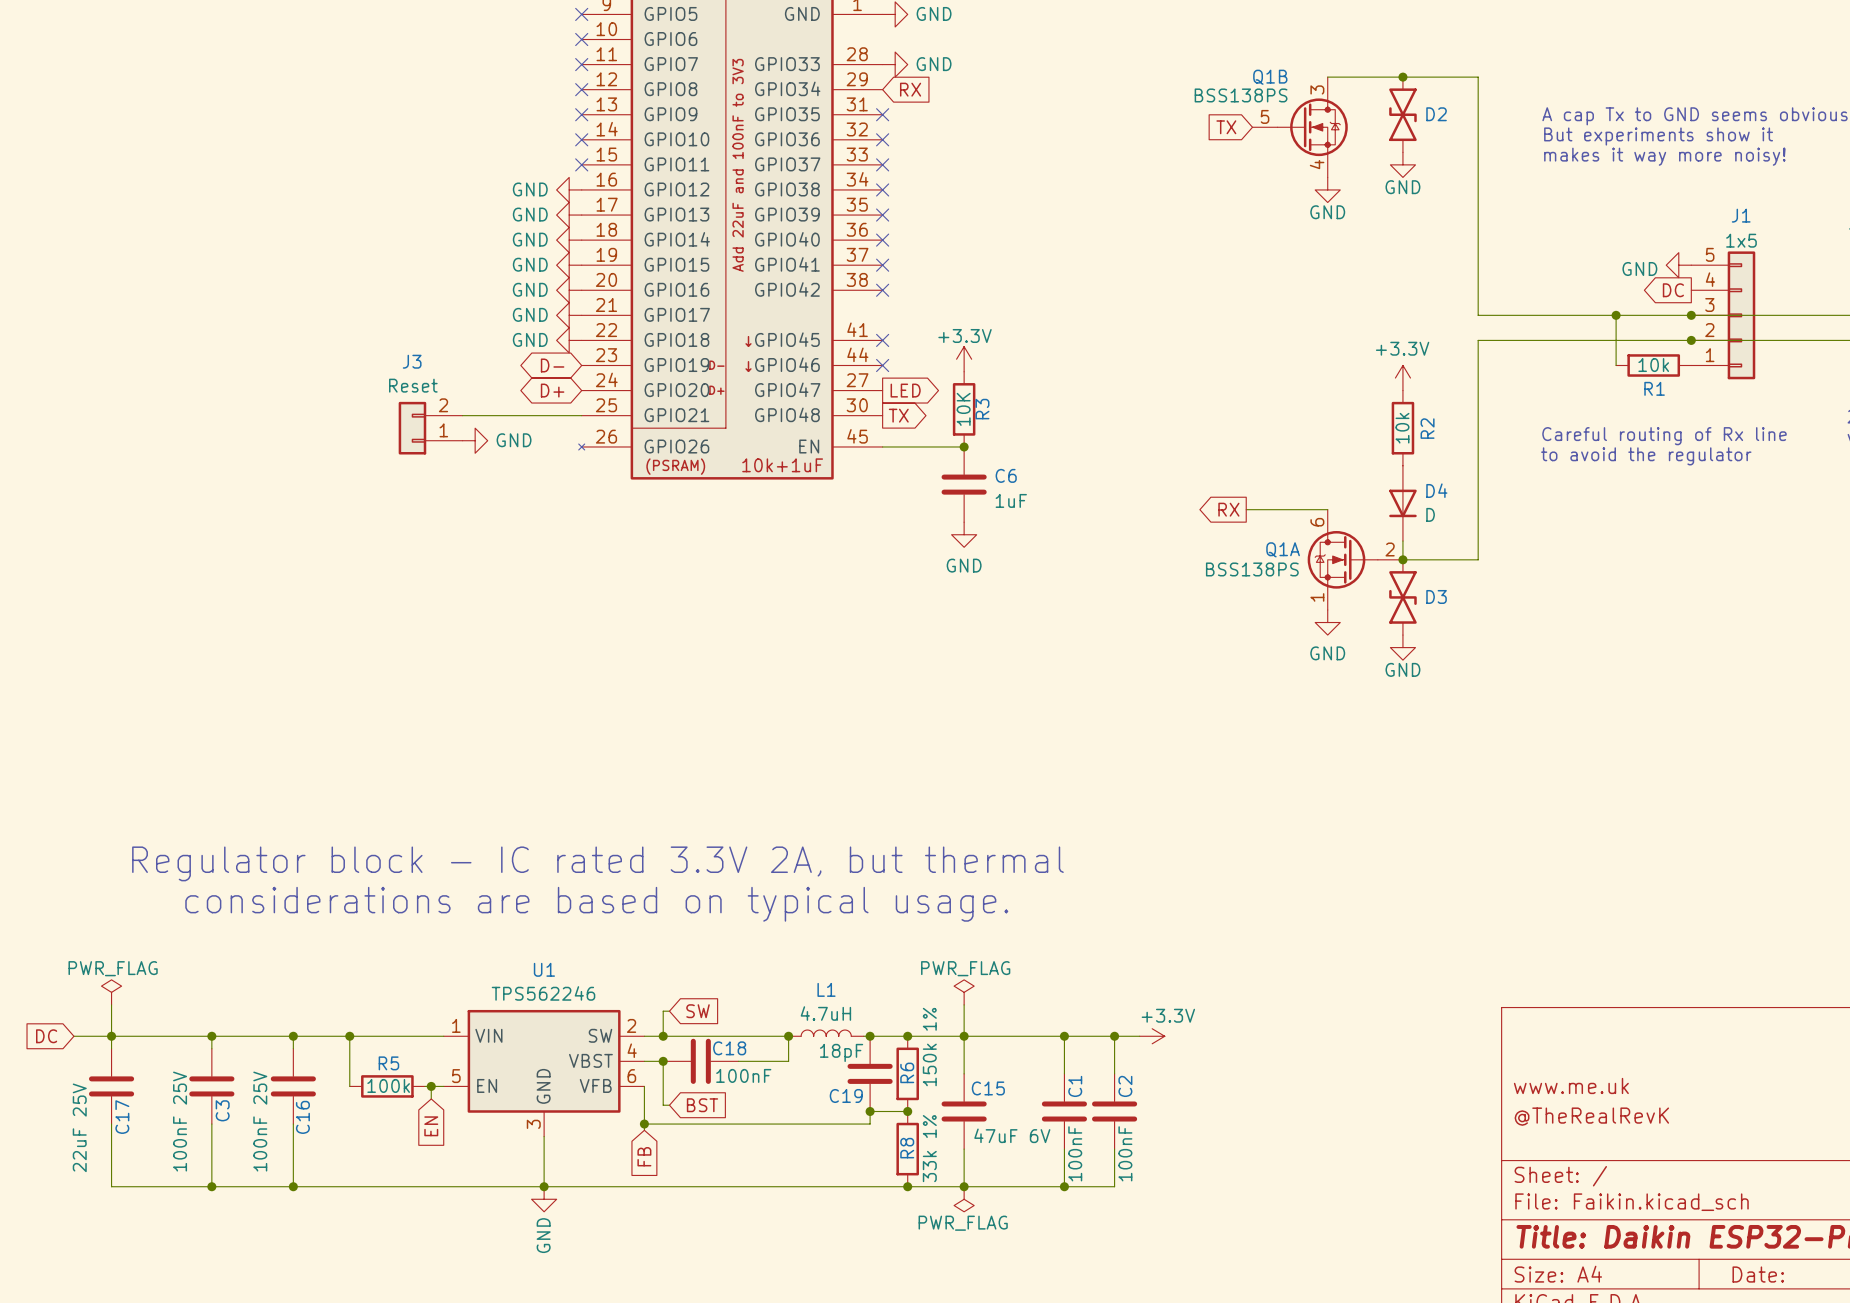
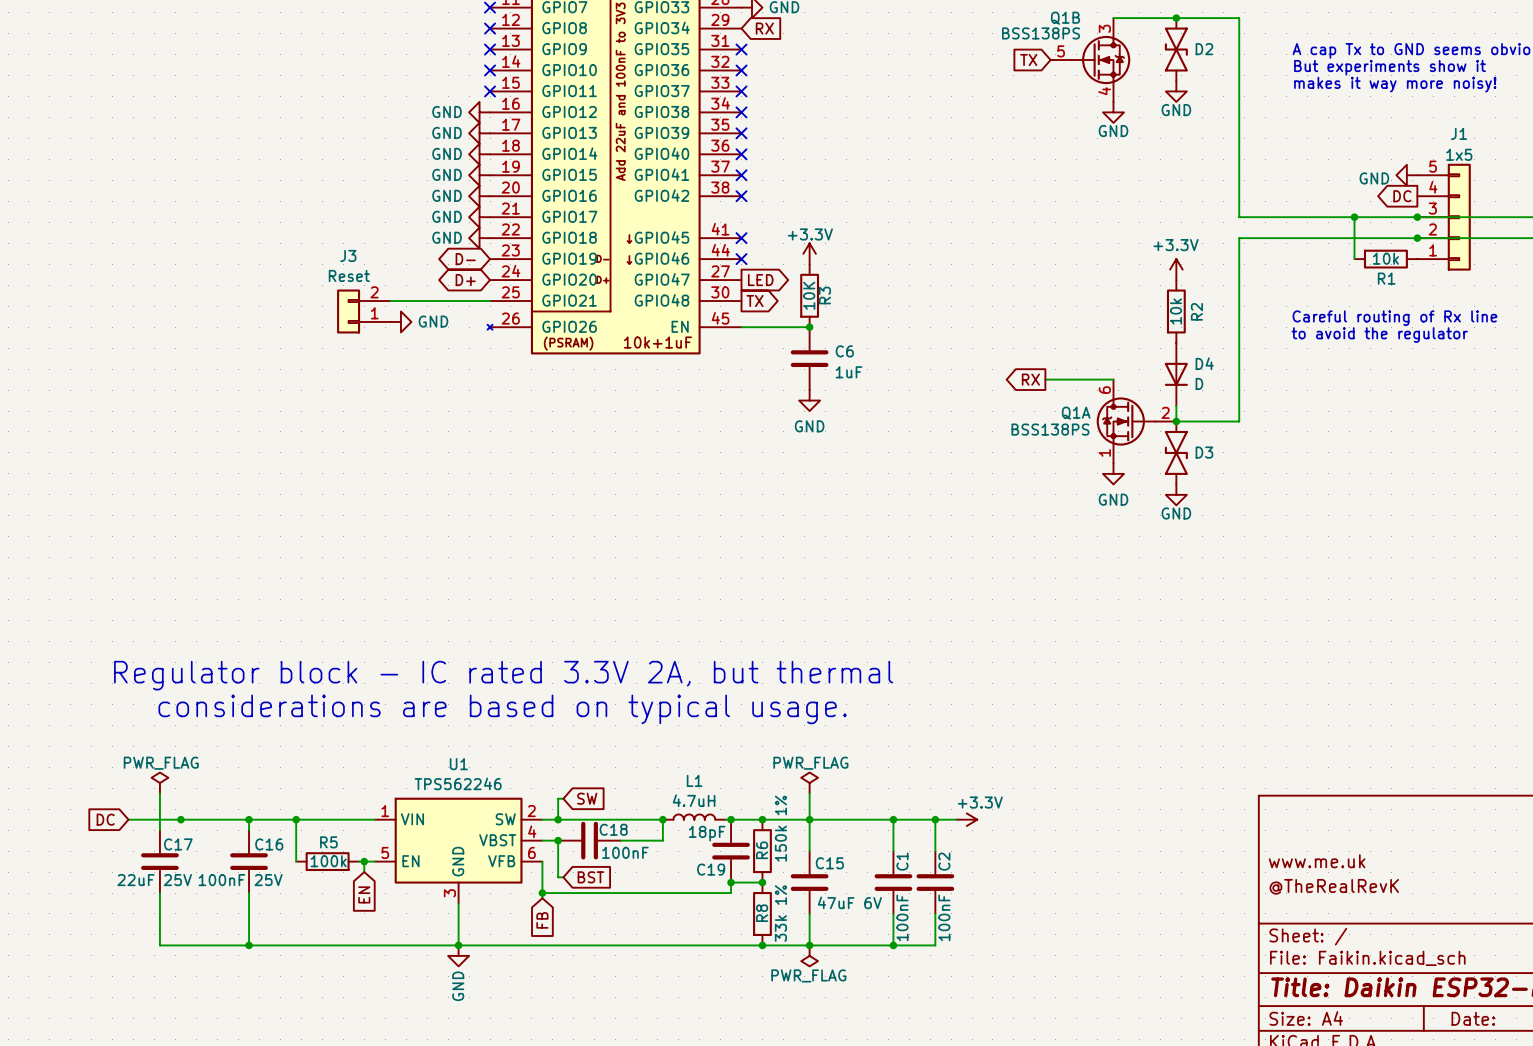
power symbol position: PWR_FLAG (111, 992) -> PWR_FLAG (159, 783)
wire: (111, 1004) (111, 1048) -> (159, 793) (159, 830)
global label position: DC (46, 1036) -> DC (105, 819)
wire: (73, 1036) (149, 1036) -> none
junction: (111, 1036) -> none
wire: (211, 1036) (211, 1048) -> none
C17 position: (111, 1086) -> (159, 861)
C3: 100nF 25V (211, 1086) -> none
C17 name rotation: 0° (122, 1117) -> 90° clockwise (178, 844)
C17 name position: C17 (122, 1117) -> C17 (178, 844)
C16 name rotation: 0° (302, 1117) -> 90° clockwise (269, 844)
C16 name position: C16 (302, 1117) -> C16 (269, 844)
C16 value rotation: 0° (260, 1121) -> 90° clockwise (240, 880)
wire: (111, 1124) (111, 1186) (186, 1186) -> (159, 893) (159, 945)
wire: (211, 1124) (211, 1186) -> none
C17 value rotation: 0° (79, 1127) -> 90° clockwise (154, 880)
junction: (211, 1186) -> none

